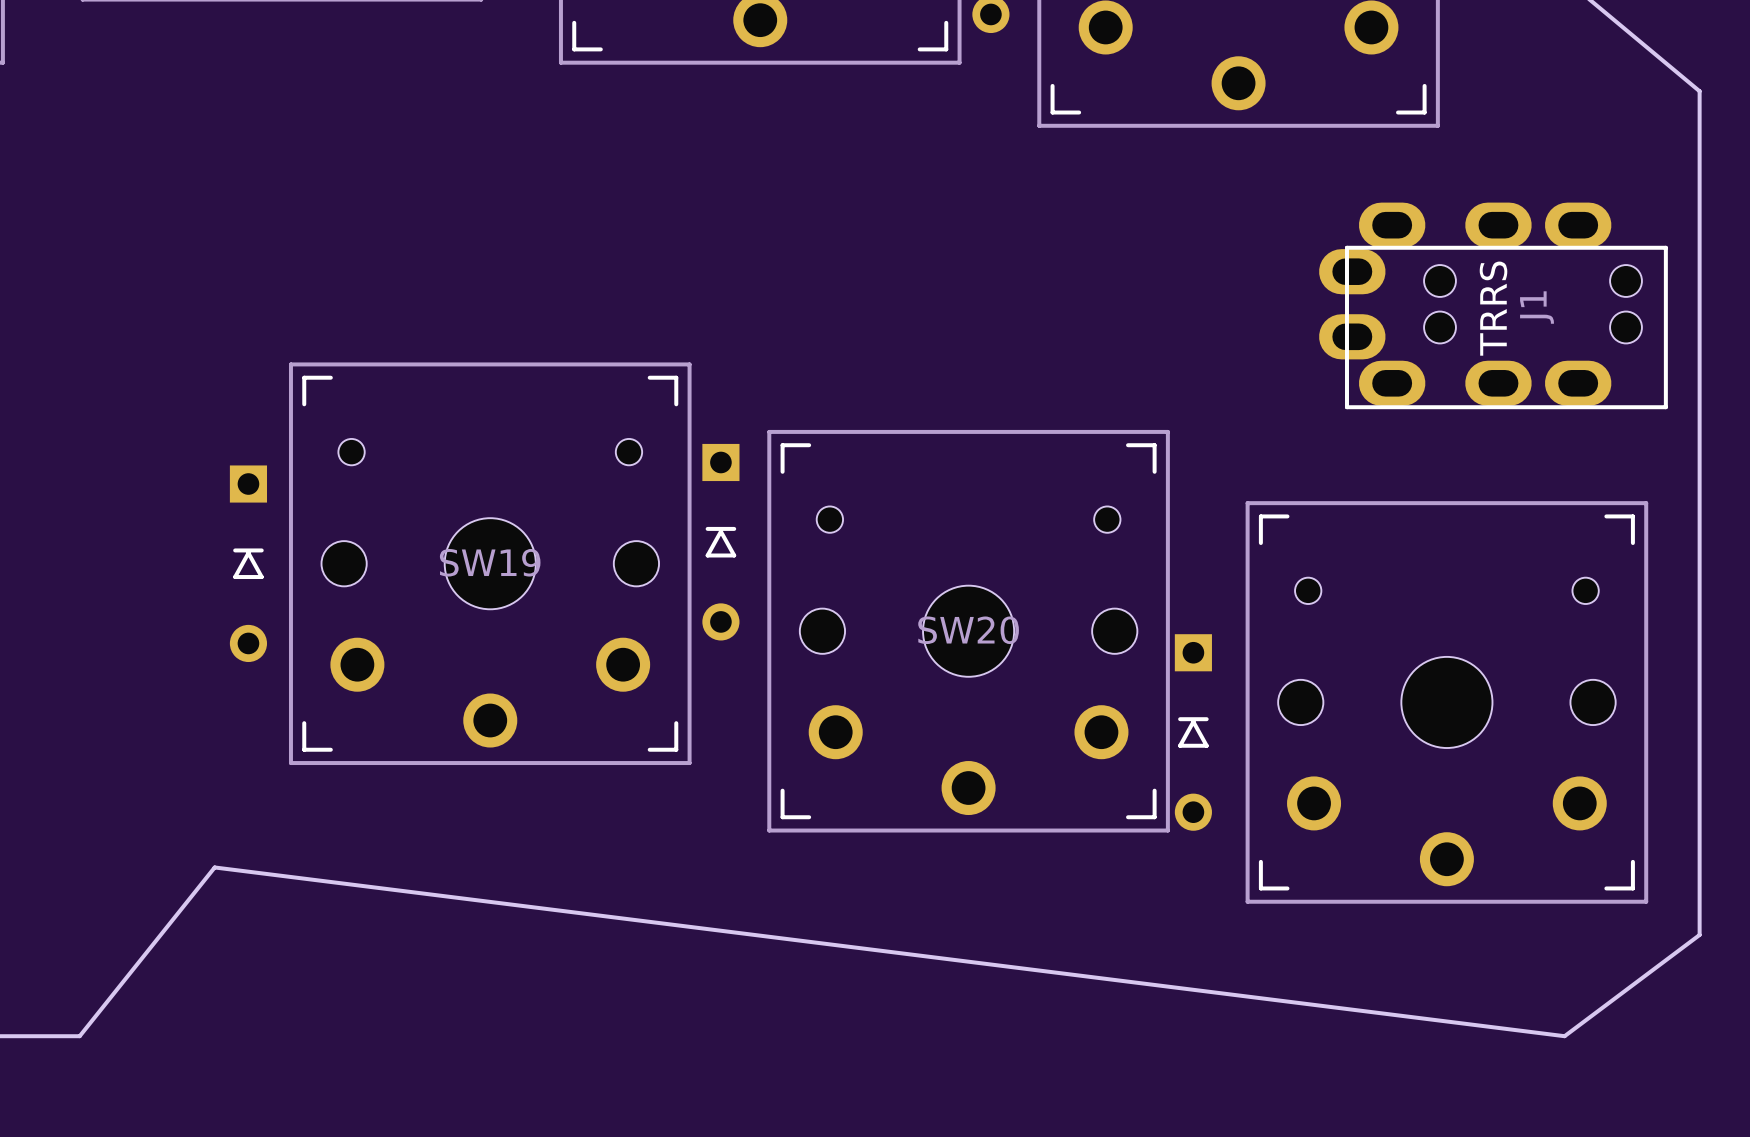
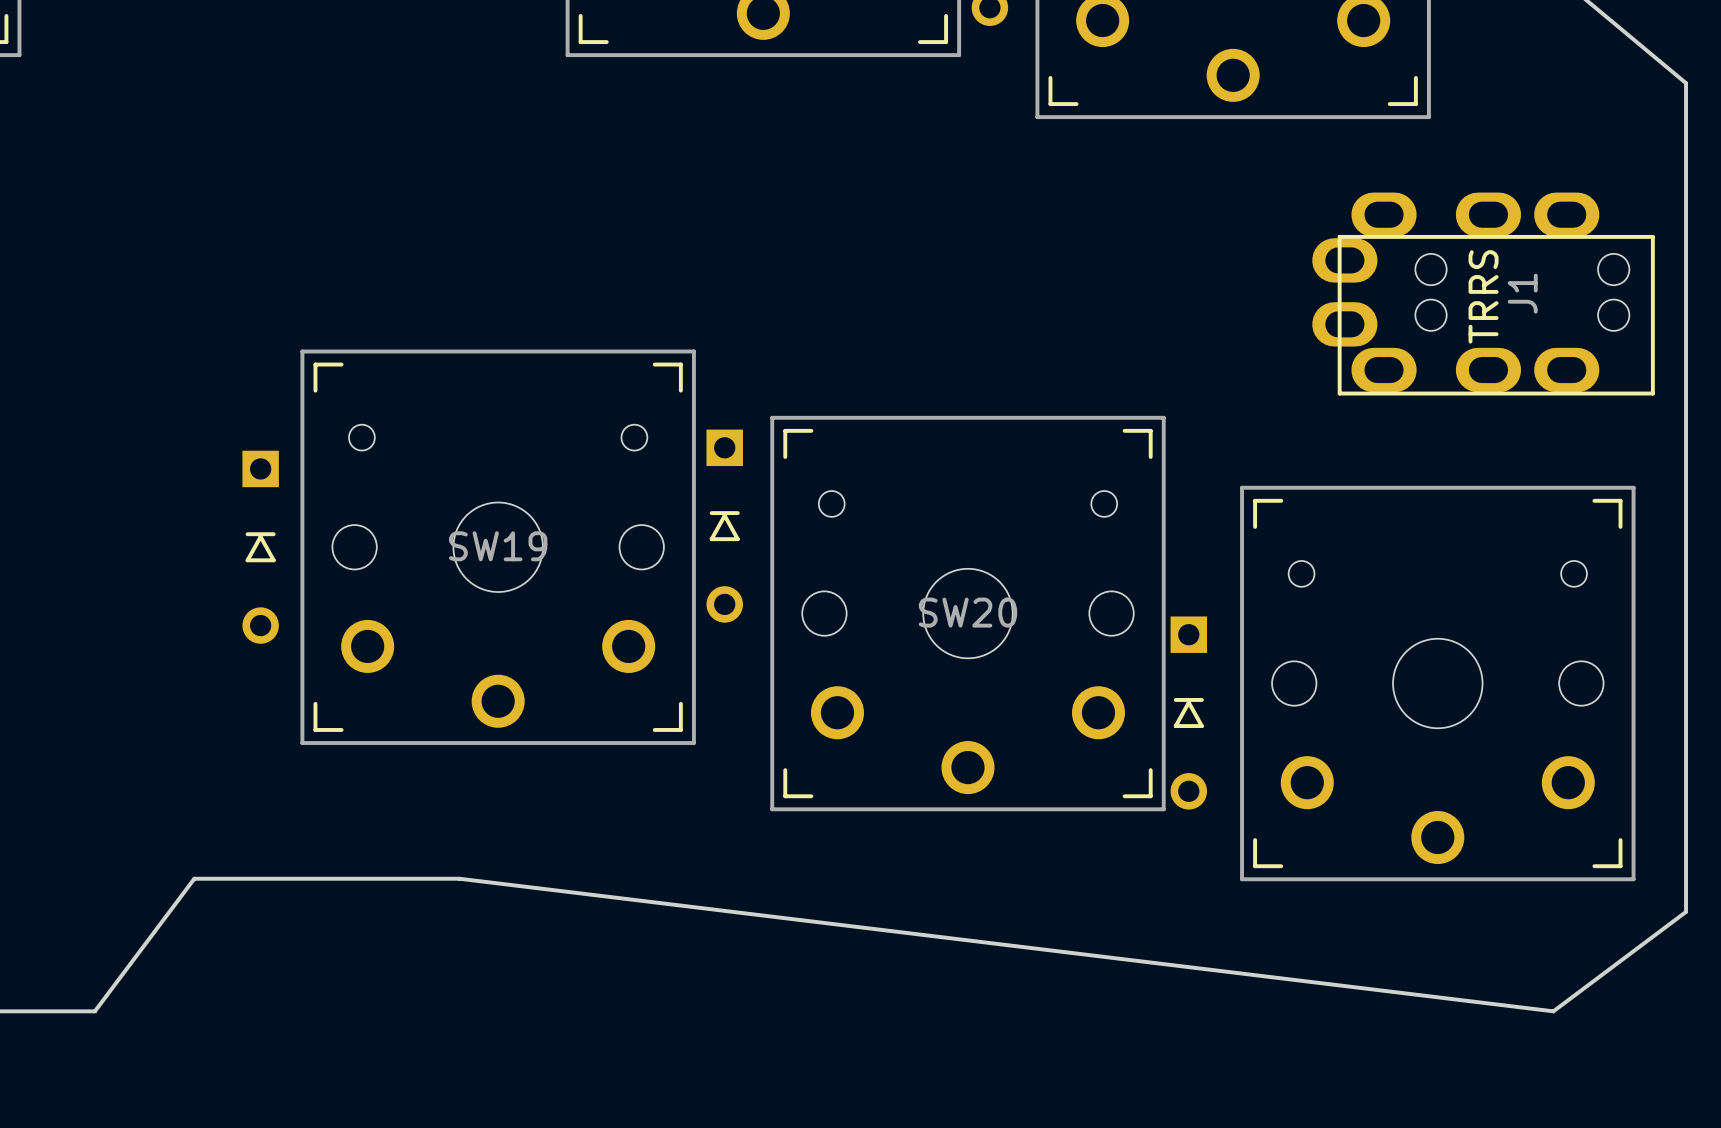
board edge: (79, 1036) (214, 867) (1564, 1036) -> (94, 1011) (194, 878) (459, 878) (1553, 1011)

